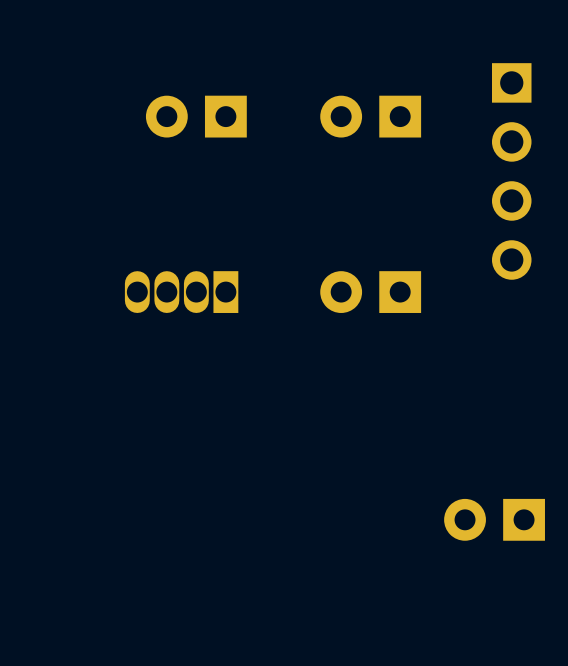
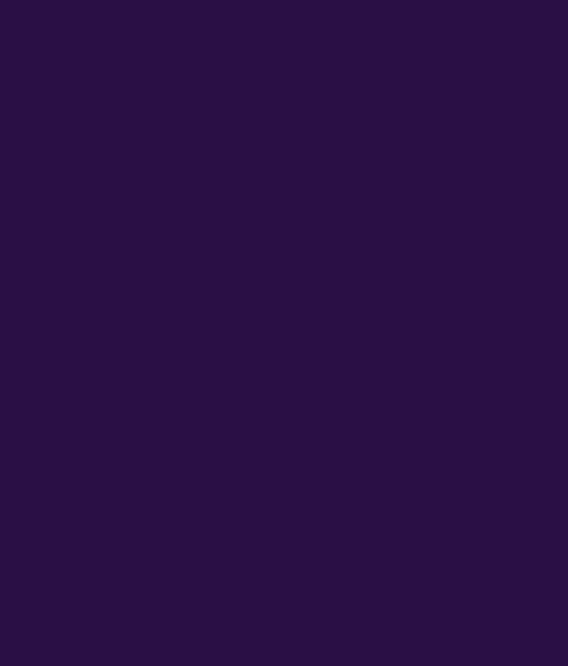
part: (196, 116) -> none
part: (370, 116) -> none
part: (511, 171) -> none
part: (181, 292) -> none
part: (370, 292) -> none
part: (494, 519) -> none

